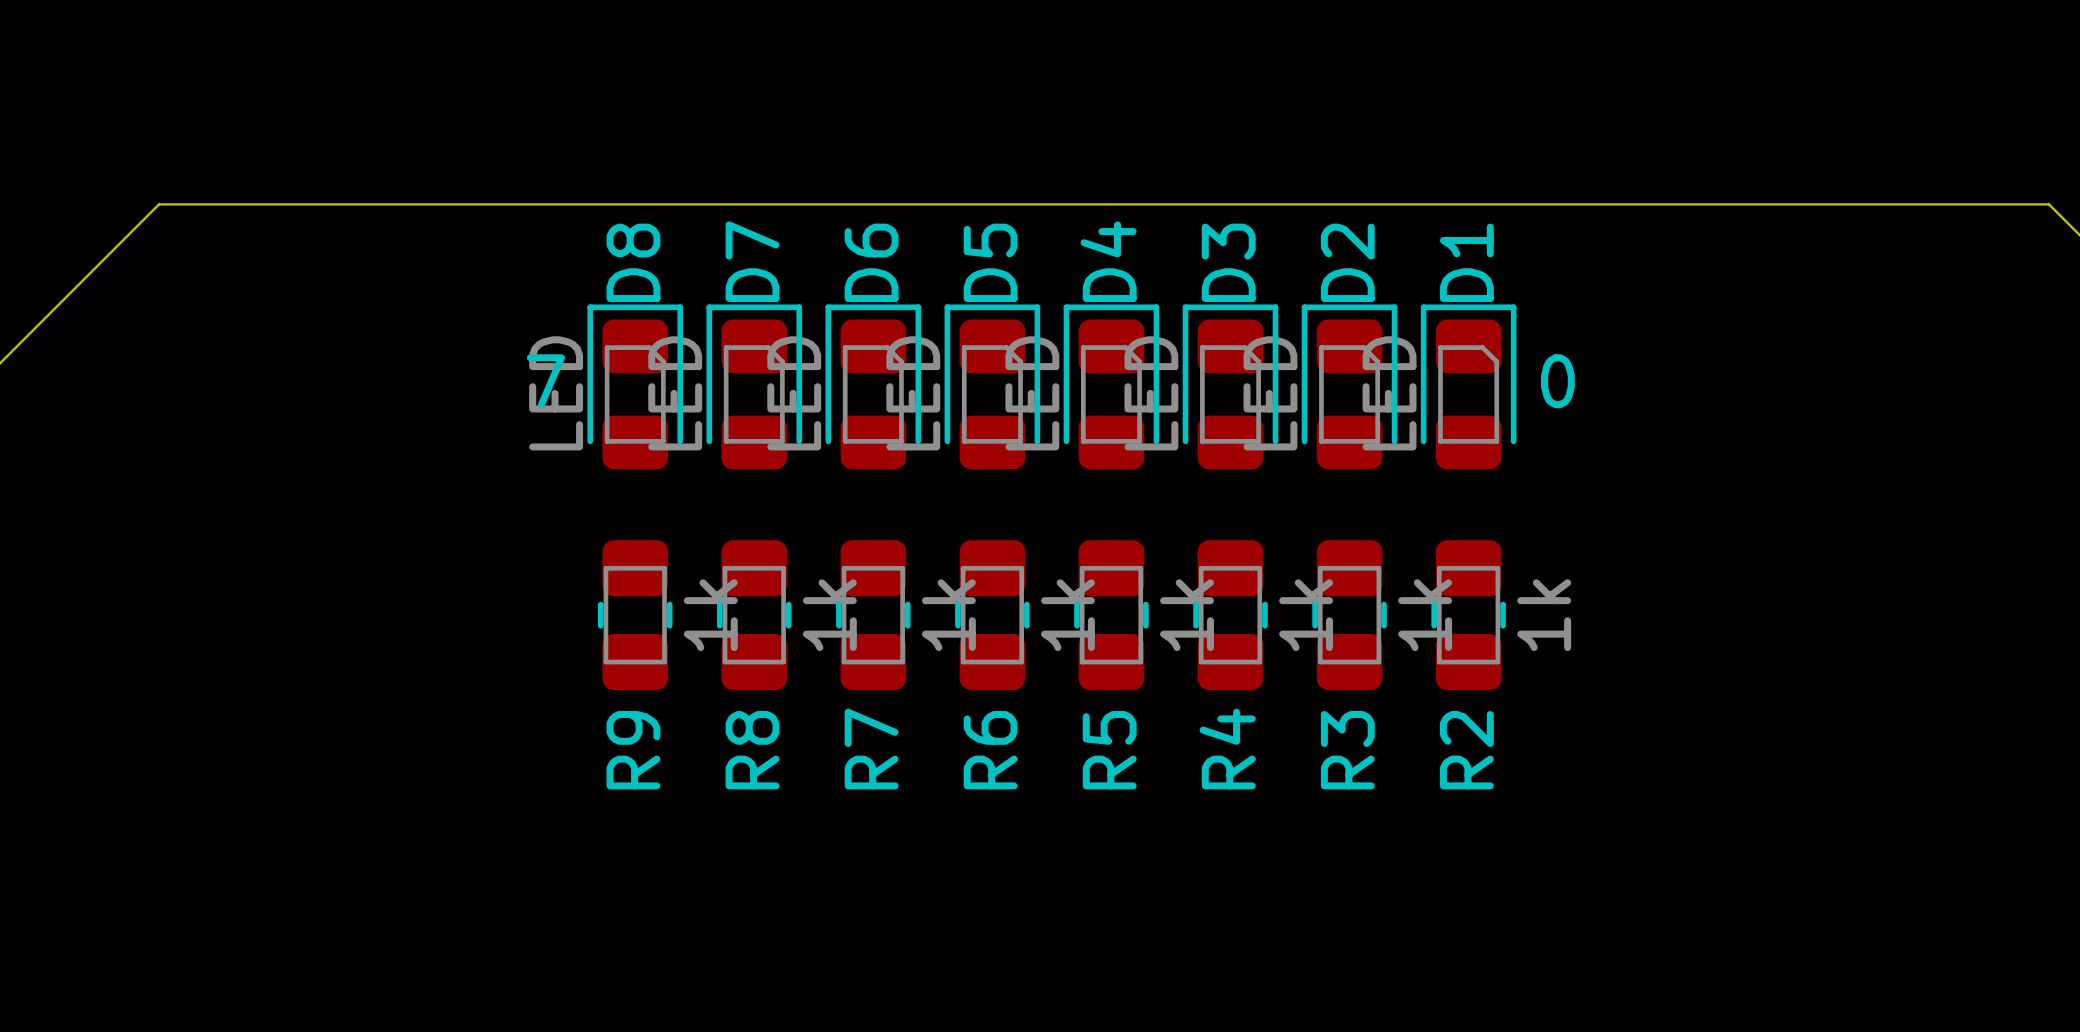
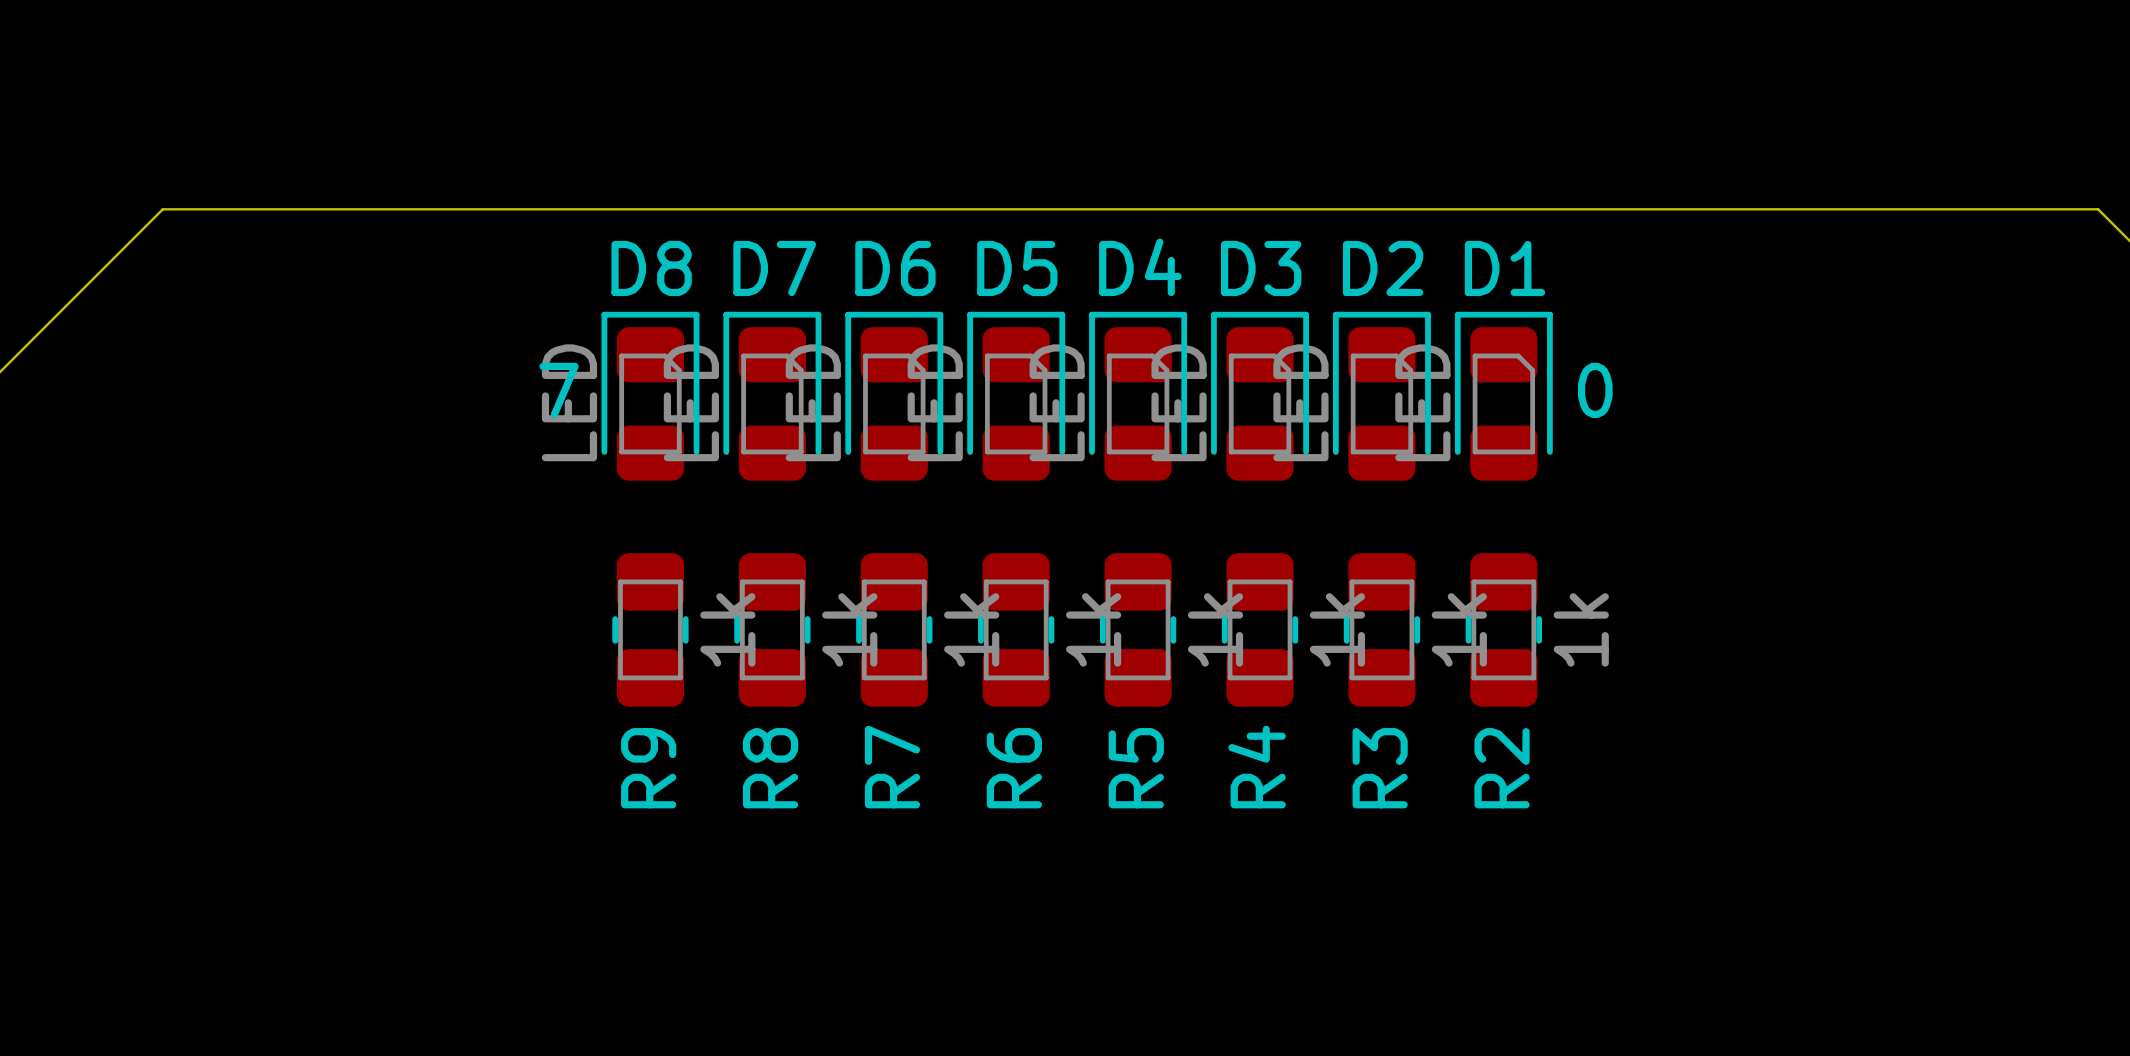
D7 name rotation: 0° (752, 261) -> 90° clockwise (774, 268)
D4 name rotation: 0° (1108, 261) -> 90° clockwise (1140, 267)
D8 name rotation: 0° (633, 262) -> 90° clockwise (651, 268)
D6 name rotation: 0° (871, 262) -> 90° clockwise (895, 268)
D5 name rotation: 0° (990, 262) -> 90° clockwise (1017, 268)
D3 name rotation: 0° (1228, 262) -> 90° clockwise (1261, 268)
D2 name rotation: 0° (1347, 262) -> 90° clockwise (1383, 268)
D1 name rotation: 0° (1466, 262) -> 90° clockwise (1504, 268)

